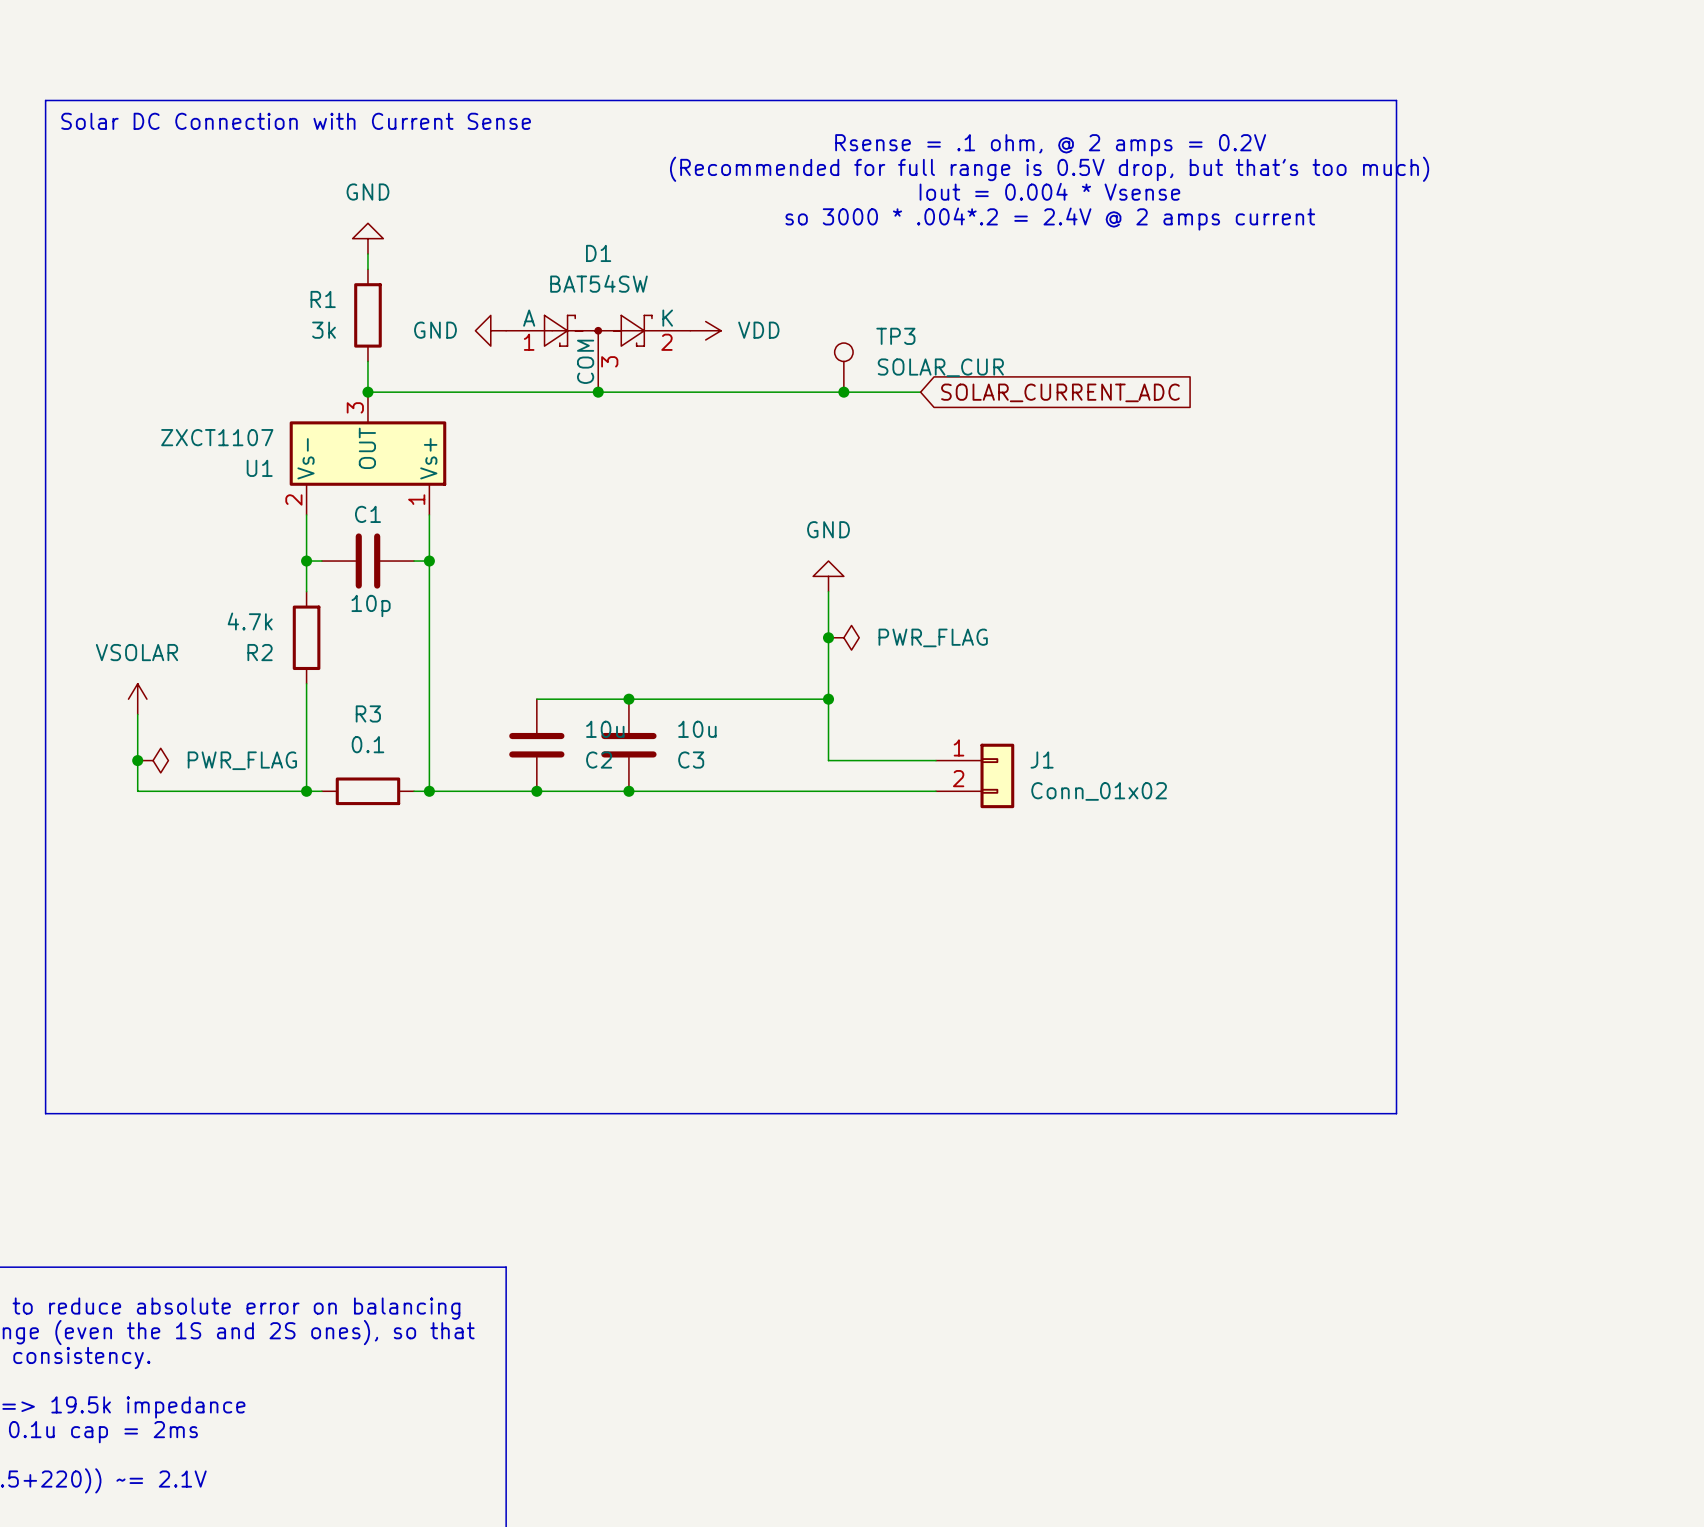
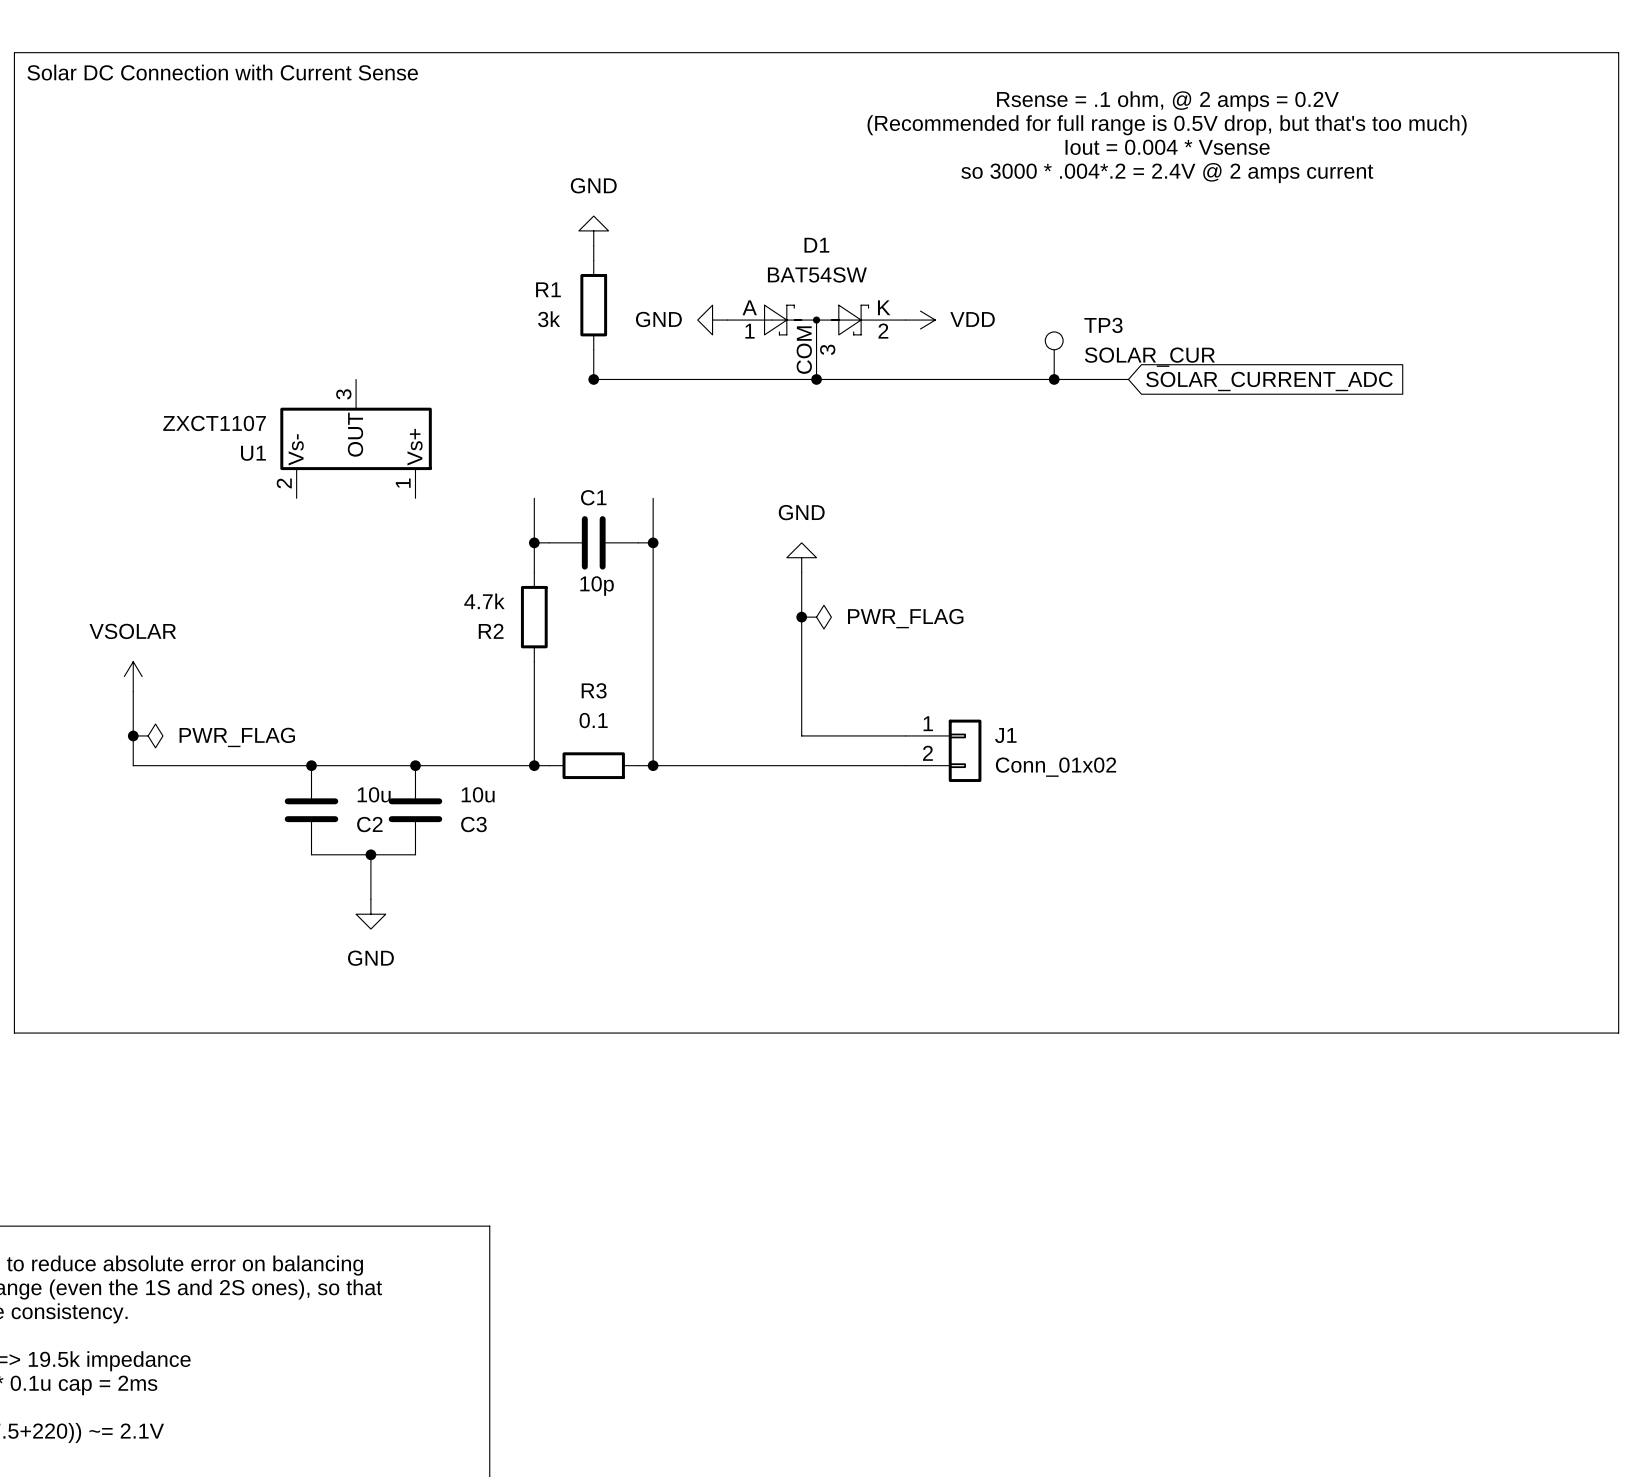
line: (45, 100) (1396, 100) (1396, 1113) (45, 1113) (45, 100) -> (14, 52) (14, 1033) (1618, 1033) (1618, 52) (14, 52)
text position: Solar DC Connection with Current Sense (296, 121) -> Solar DC Connection with Current Sense (222, 72)
text position: Rsense = .1 ohm, @ 2 amps = 0.2V (1050, 145) -> Rsense = .1 ohm, @ 2 amps = 0.2V (1167, 101)
text position: (Recommended for full range is 0.5V drop, but that's too much) (1049, 169) -> (Recommended for full range is 0.5V drop, but that's too much) (1167, 125)
text position: Iout = 0.004 * Vsense (1049, 191) -> Iout = 0.004 * Vsense (1167, 147)
text position: so 3000 * .004*.2 = 2.4V @ 2 amps current (1050, 219) -> so 3000 * .004*.2 = 2.4V @ 2 amps current (1167, 173)
power symbol: GND (367, 238) -> none
power symbol: none -> GND (593, 230)
wire: (367, 254) (367, 269) -> (593, 245) (593, 260)
R1 position: (367, 315) -> (593, 305)
power symbol: GND (490, 330) -> none
power symbol position: VDD (705, 330) -> VDD (920, 320)
power symbol: none -> GND (712, 320)
D1 position: (598, 353) -> (816, 342)
wire: (367, 361) (367, 392) (613, 392) -> (593, 349) (593, 379)
TP3 position: (843, 367) -> (1054, 355)
junction: (367, 392) -> none
junction position: (598, 392) -> (593, 379)
wire: none -> (890, 379) (1128, 379)
global label position: SOLAR_CURRENT_ADC (1060, 392) -> SOLAR_CURRENT_ADC (1269, 381)
junction: none -> (1054, 379)
wire: (306, 514) (306, 591) -> (534, 498) (534, 572)
wire: (429, 514) (429, 791) -> (653, 498) (653, 765)
wire: (306, 561) (321, 561) -> (534, 542) (549, 542)
junction: (306, 561) -> none
C1 position: (367, 561) -> (593, 542)
wire: (414, 561) (429, 561) -> (638, 542) (653, 542)
junction: (429, 561) -> none
junction: none -> (534, 542)
junction: none -> (653, 542)
R2 position: (306, 637) -> (534, 617)
wire: (306, 683) (306, 791) -> (534, 661) (534, 765)
wire: (536, 699) (828, 699) -> none
junction: (628, 699) -> none
junction: (828, 699) -> none
C2 position: (536, 745) -> (311, 810)
C3 position: (628, 745) -> (415, 810)
junction position: (306, 791) -> (311, 765)
R3 position: (367, 791) -> (593, 765)
junction position: (536, 791) -> (534, 765)
wire: (567, 791) (659, 791) -> (311, 765) (400, 765)
junction: (628, 791) -> none
junction: none -> (653, 765)
wire: none -> (311, 854) (415, 854)
wire: none -> (370, 854) (370, 899)
junction: none -> (370, 854)
power symbol: none -> GND (370, 914)

